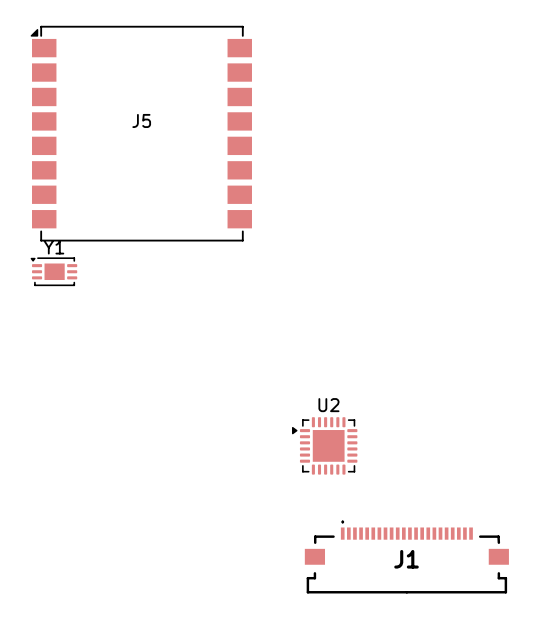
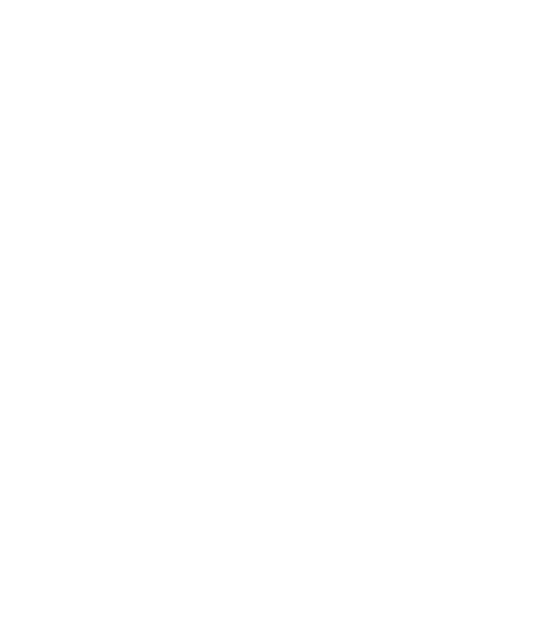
J5: (141, 133) -> none
Y1: (53, 271) -> none
U2: (324, 445) -> none
J1: (406, 557) -> none

